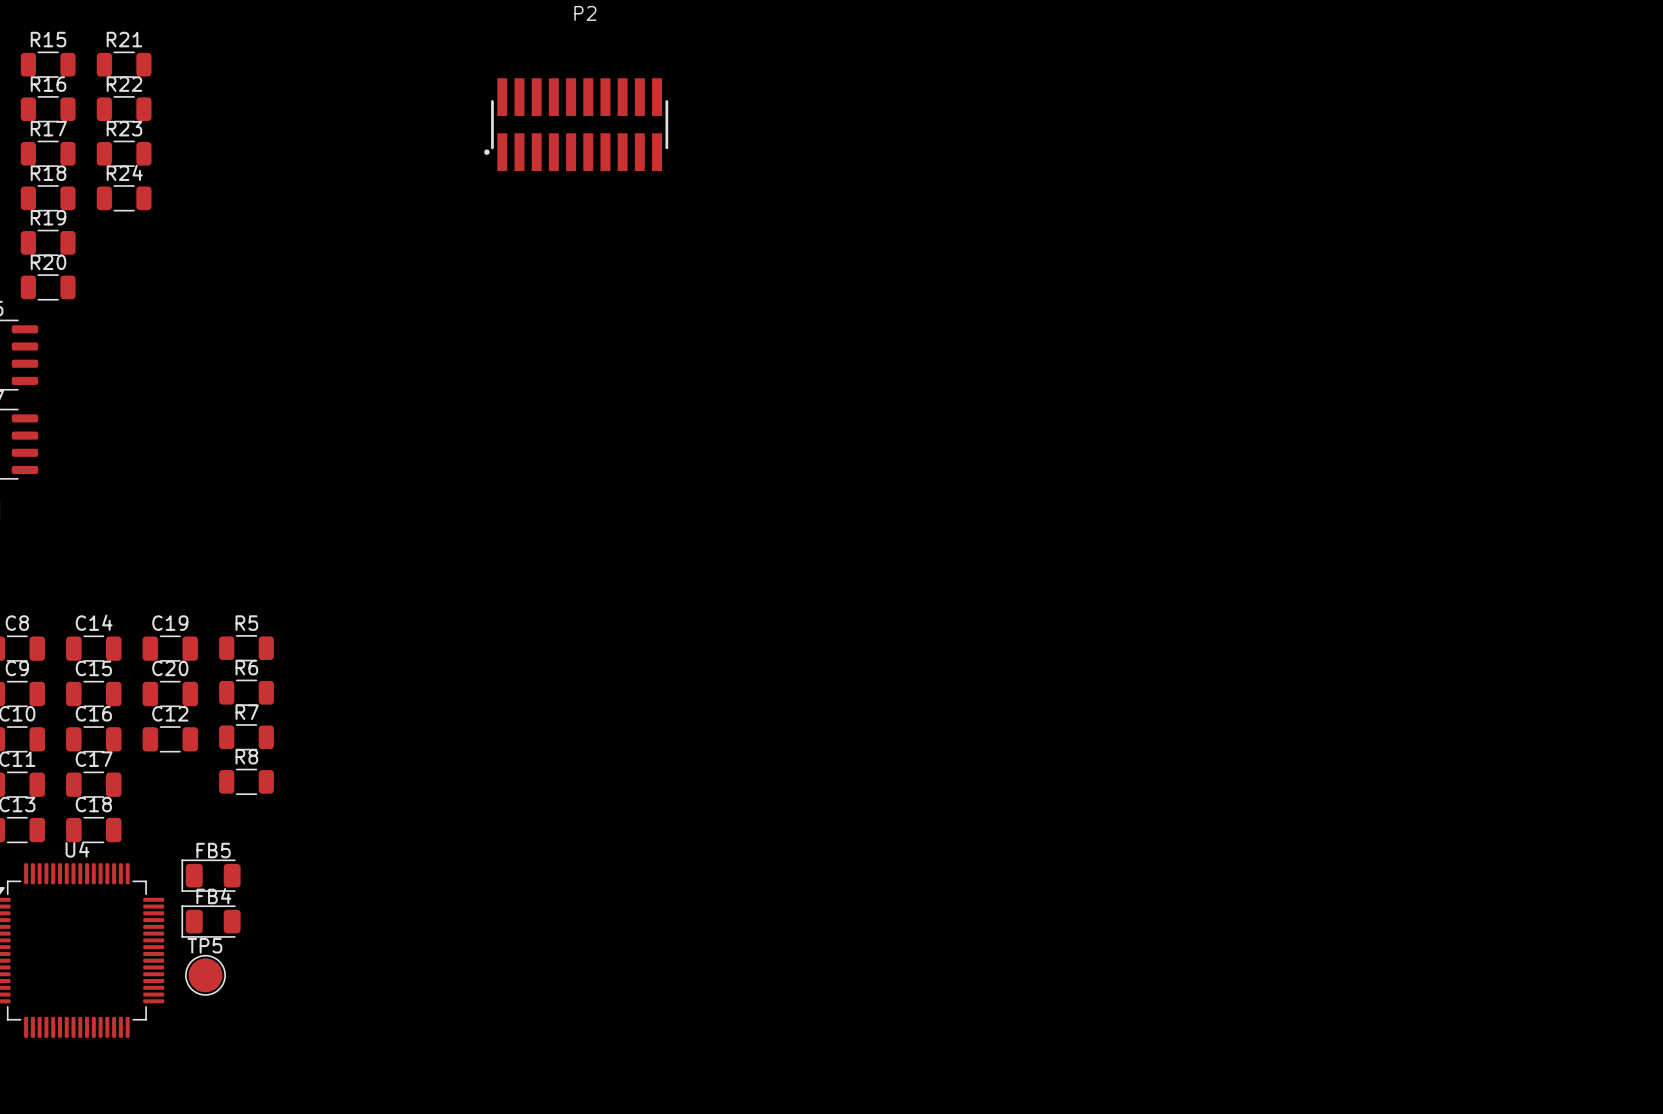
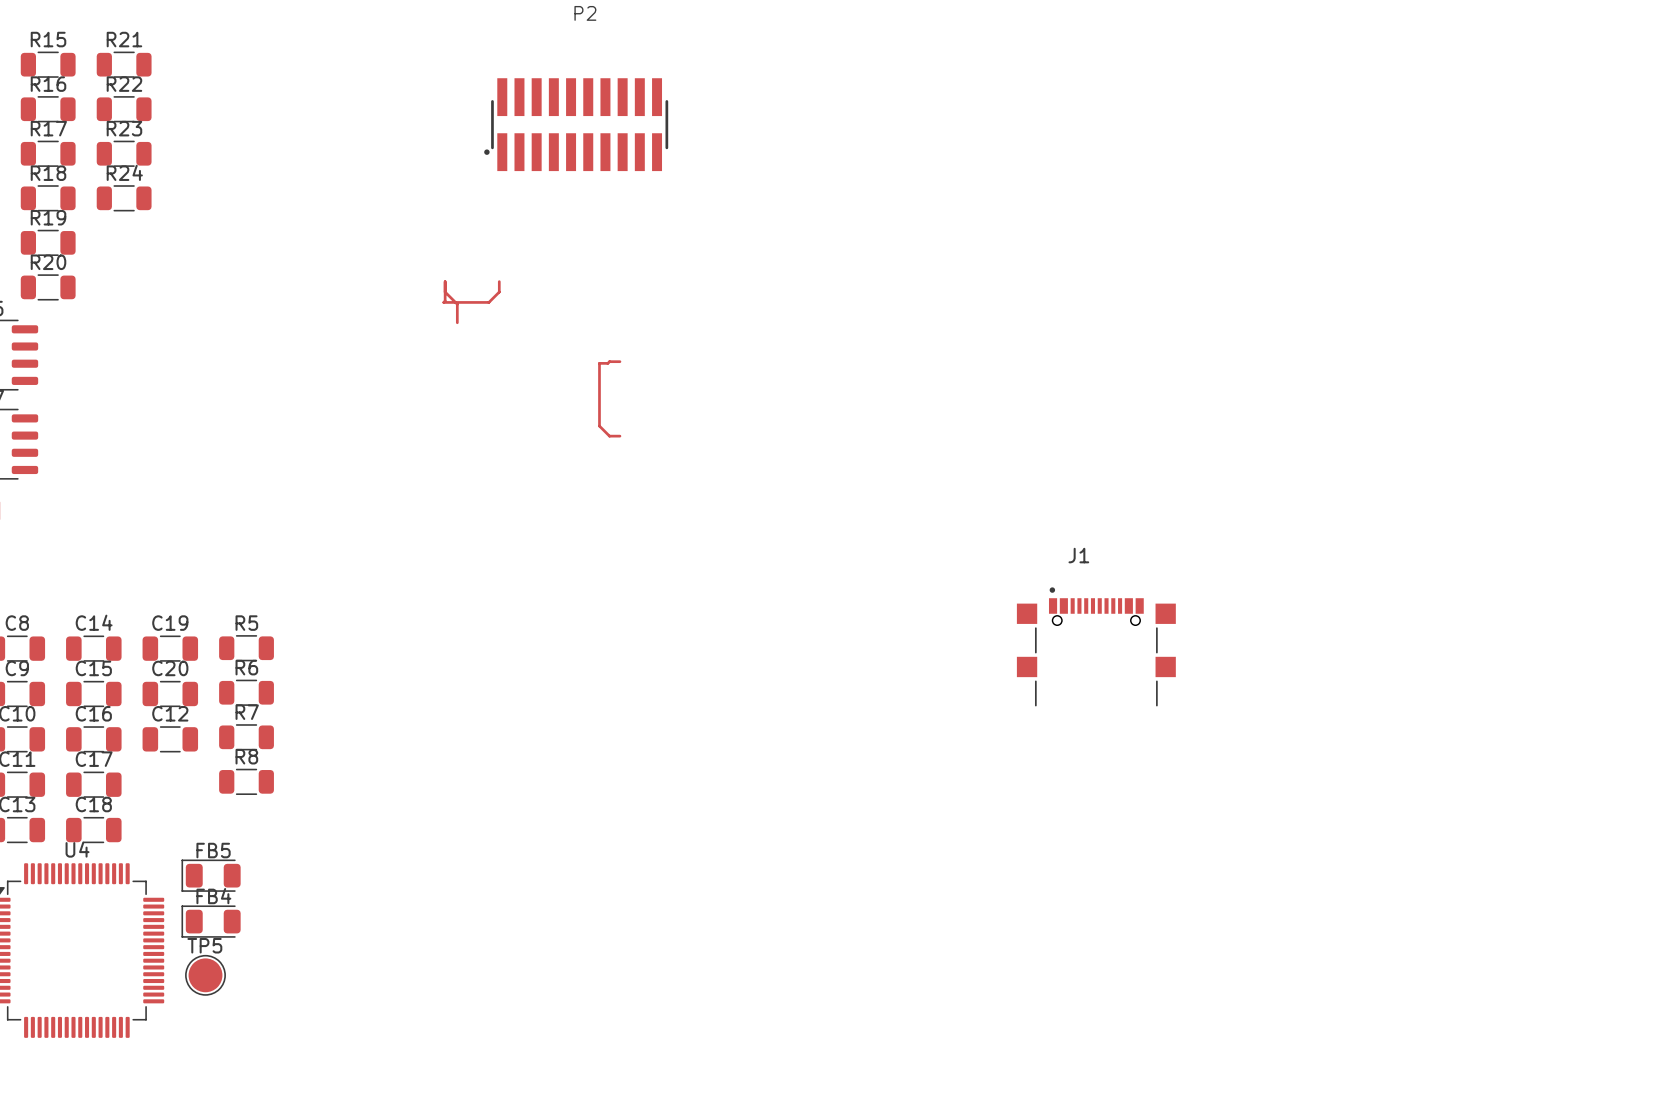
top track: none -> (445, 281) (443, 302) (488, 302) (499, 292) (499, 281)
top track: none -> (445, 292) (457, 304) (457, 322)
top track: none -> (619, 361) (599, 363) (599, 426) (609, 436) (619, 436)
J1: none -> (1096, 646)

